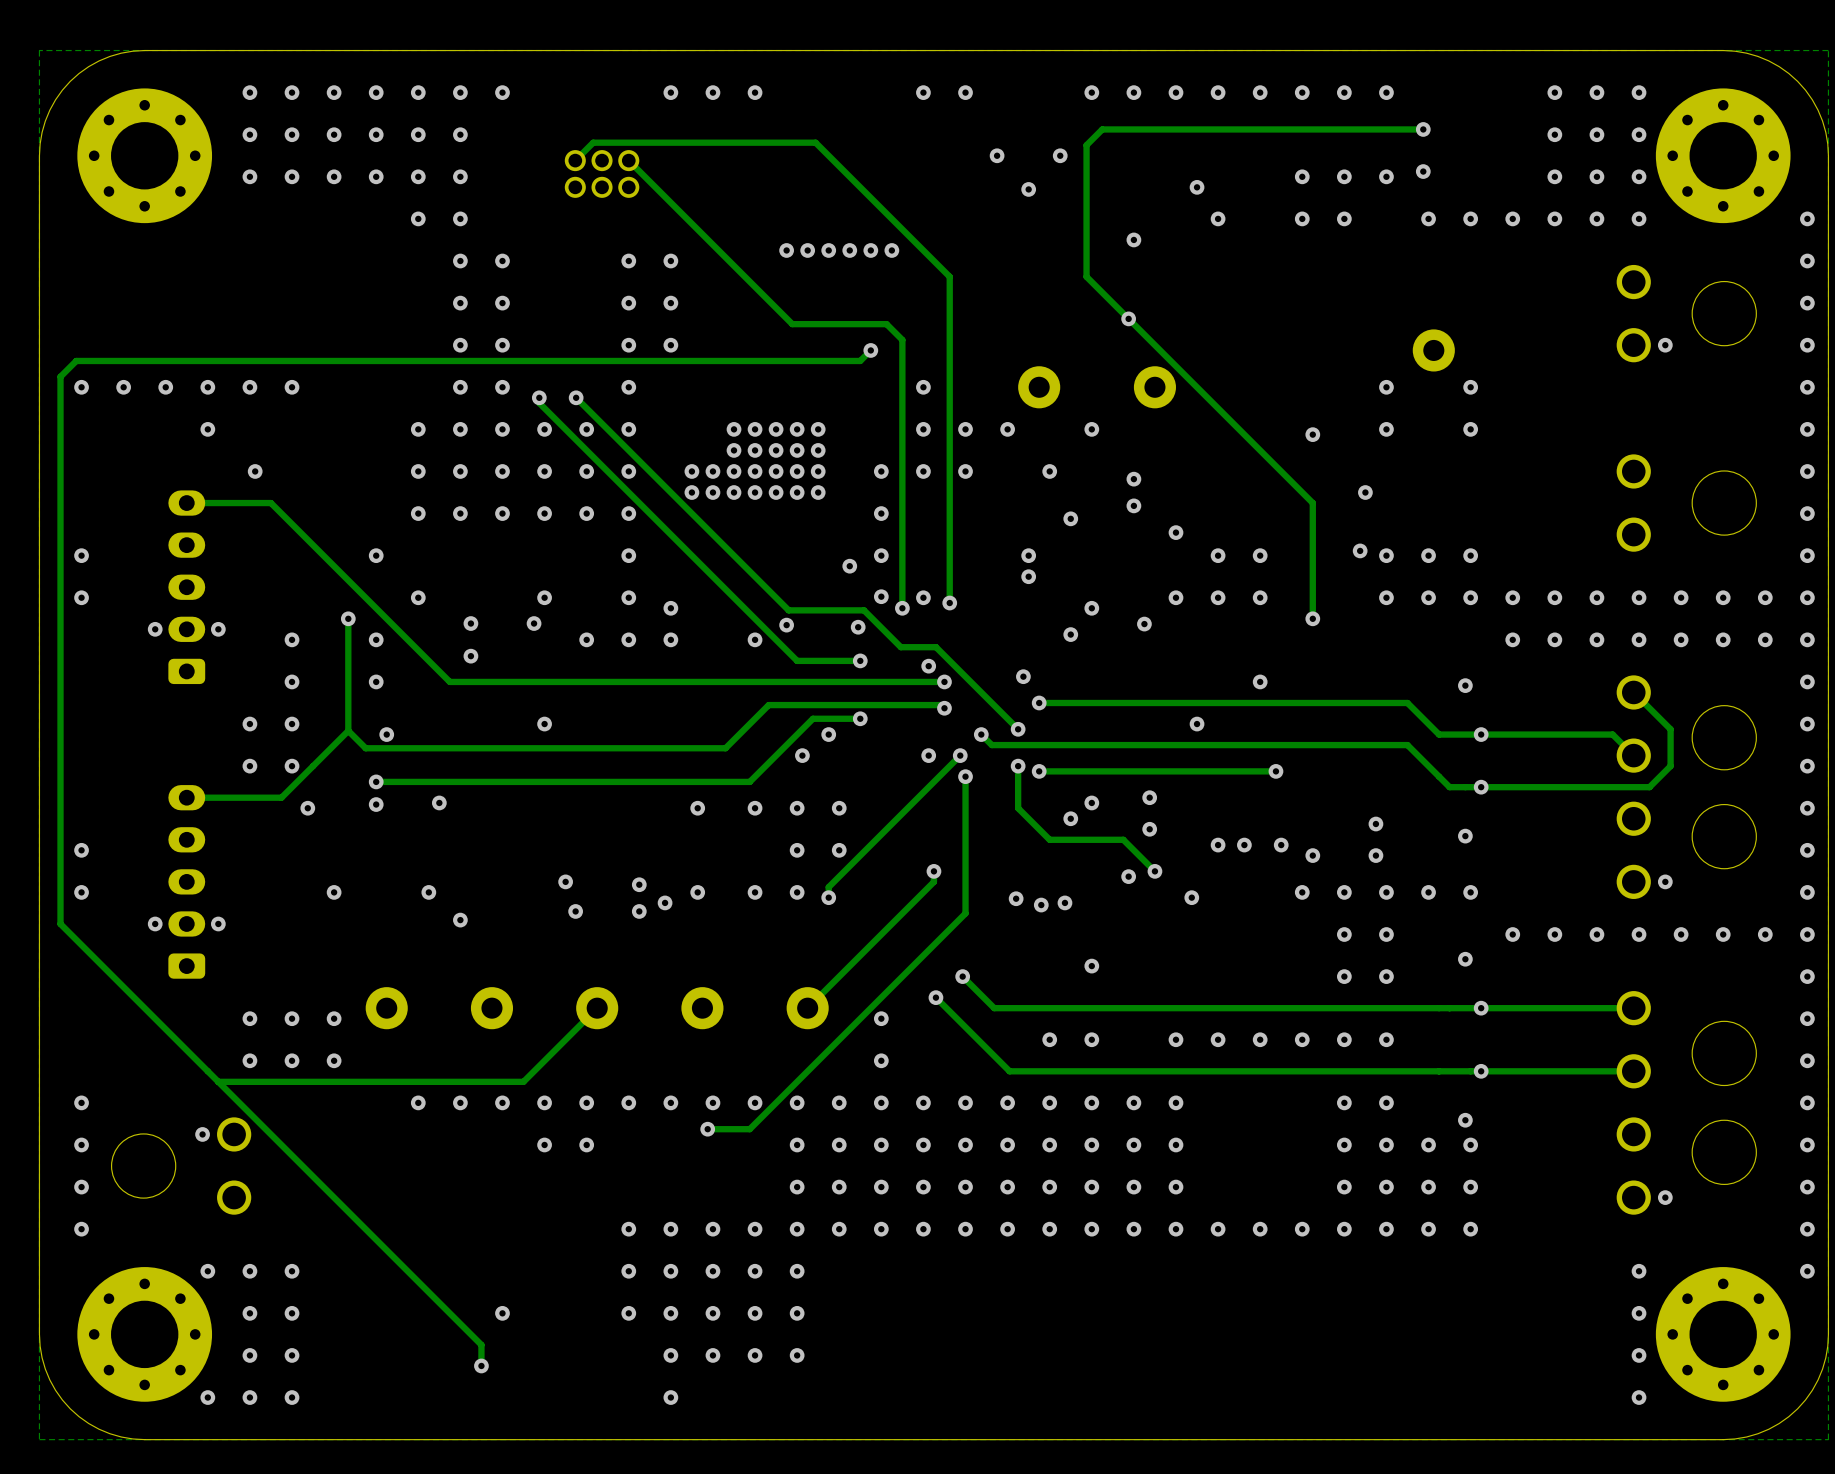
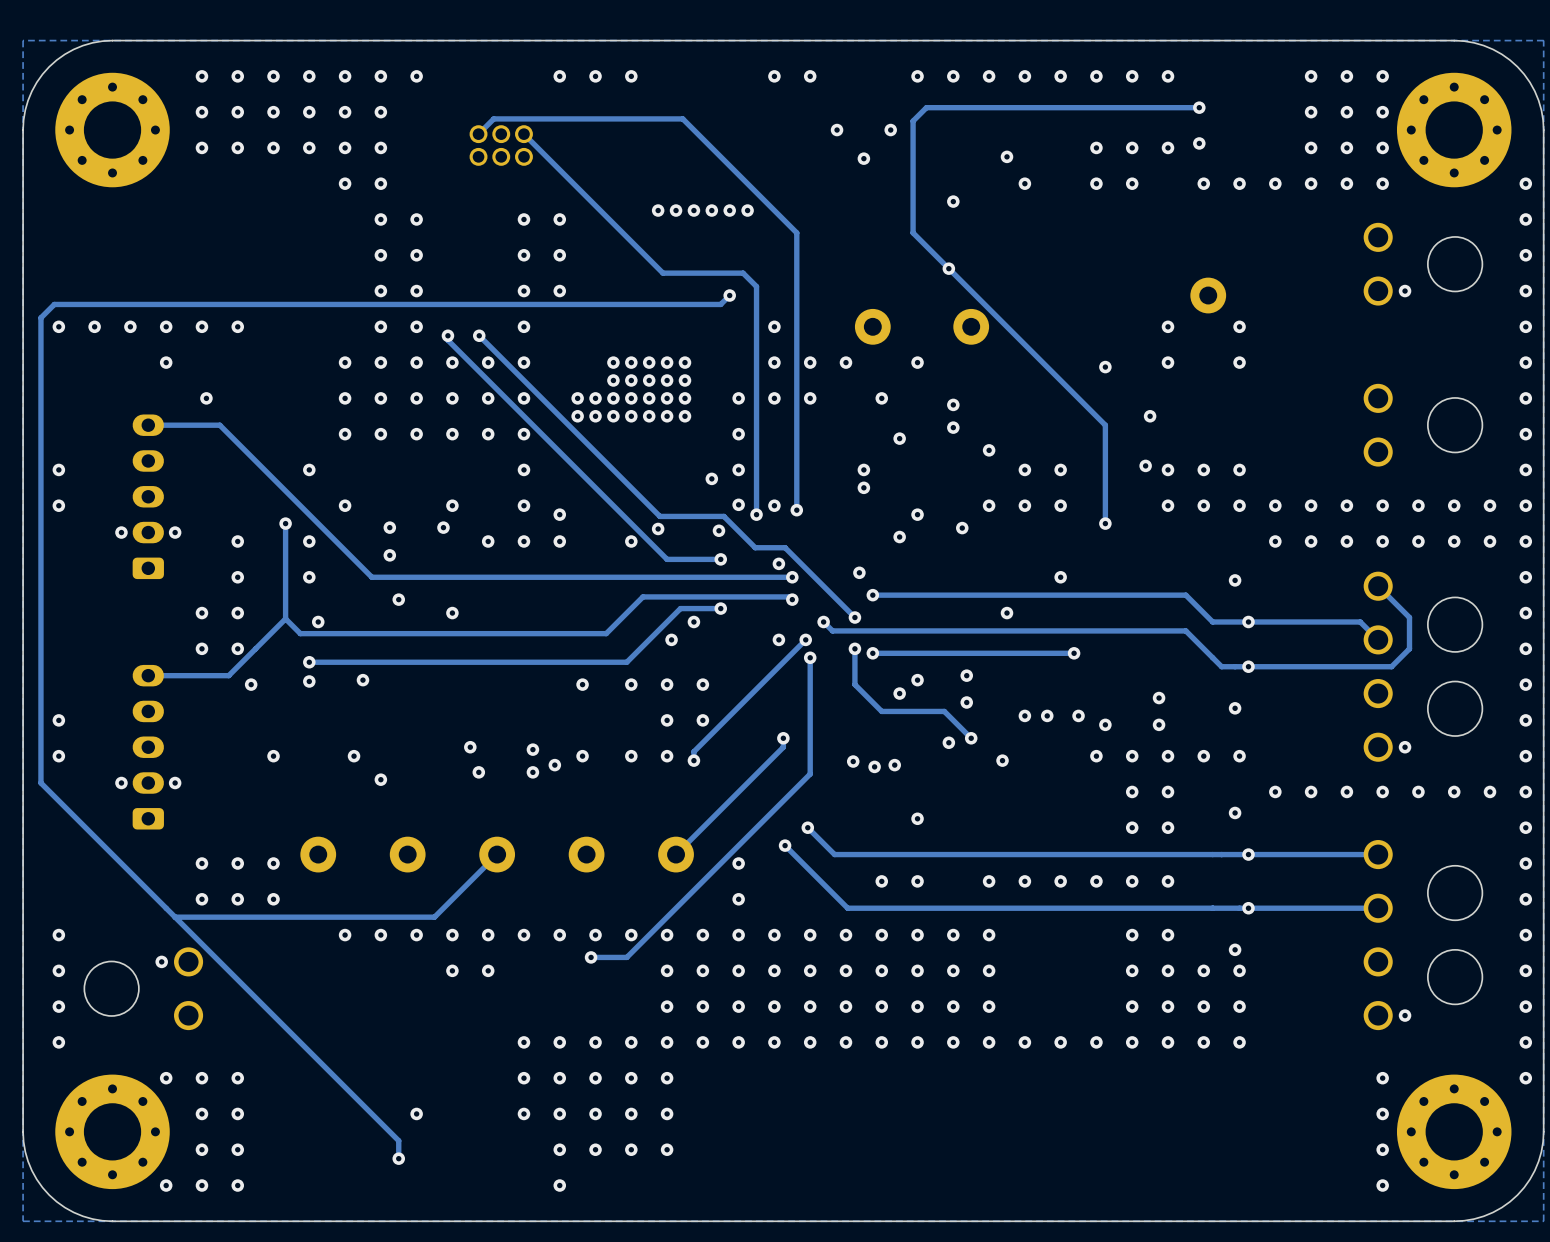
via: none -> (398, 599)

